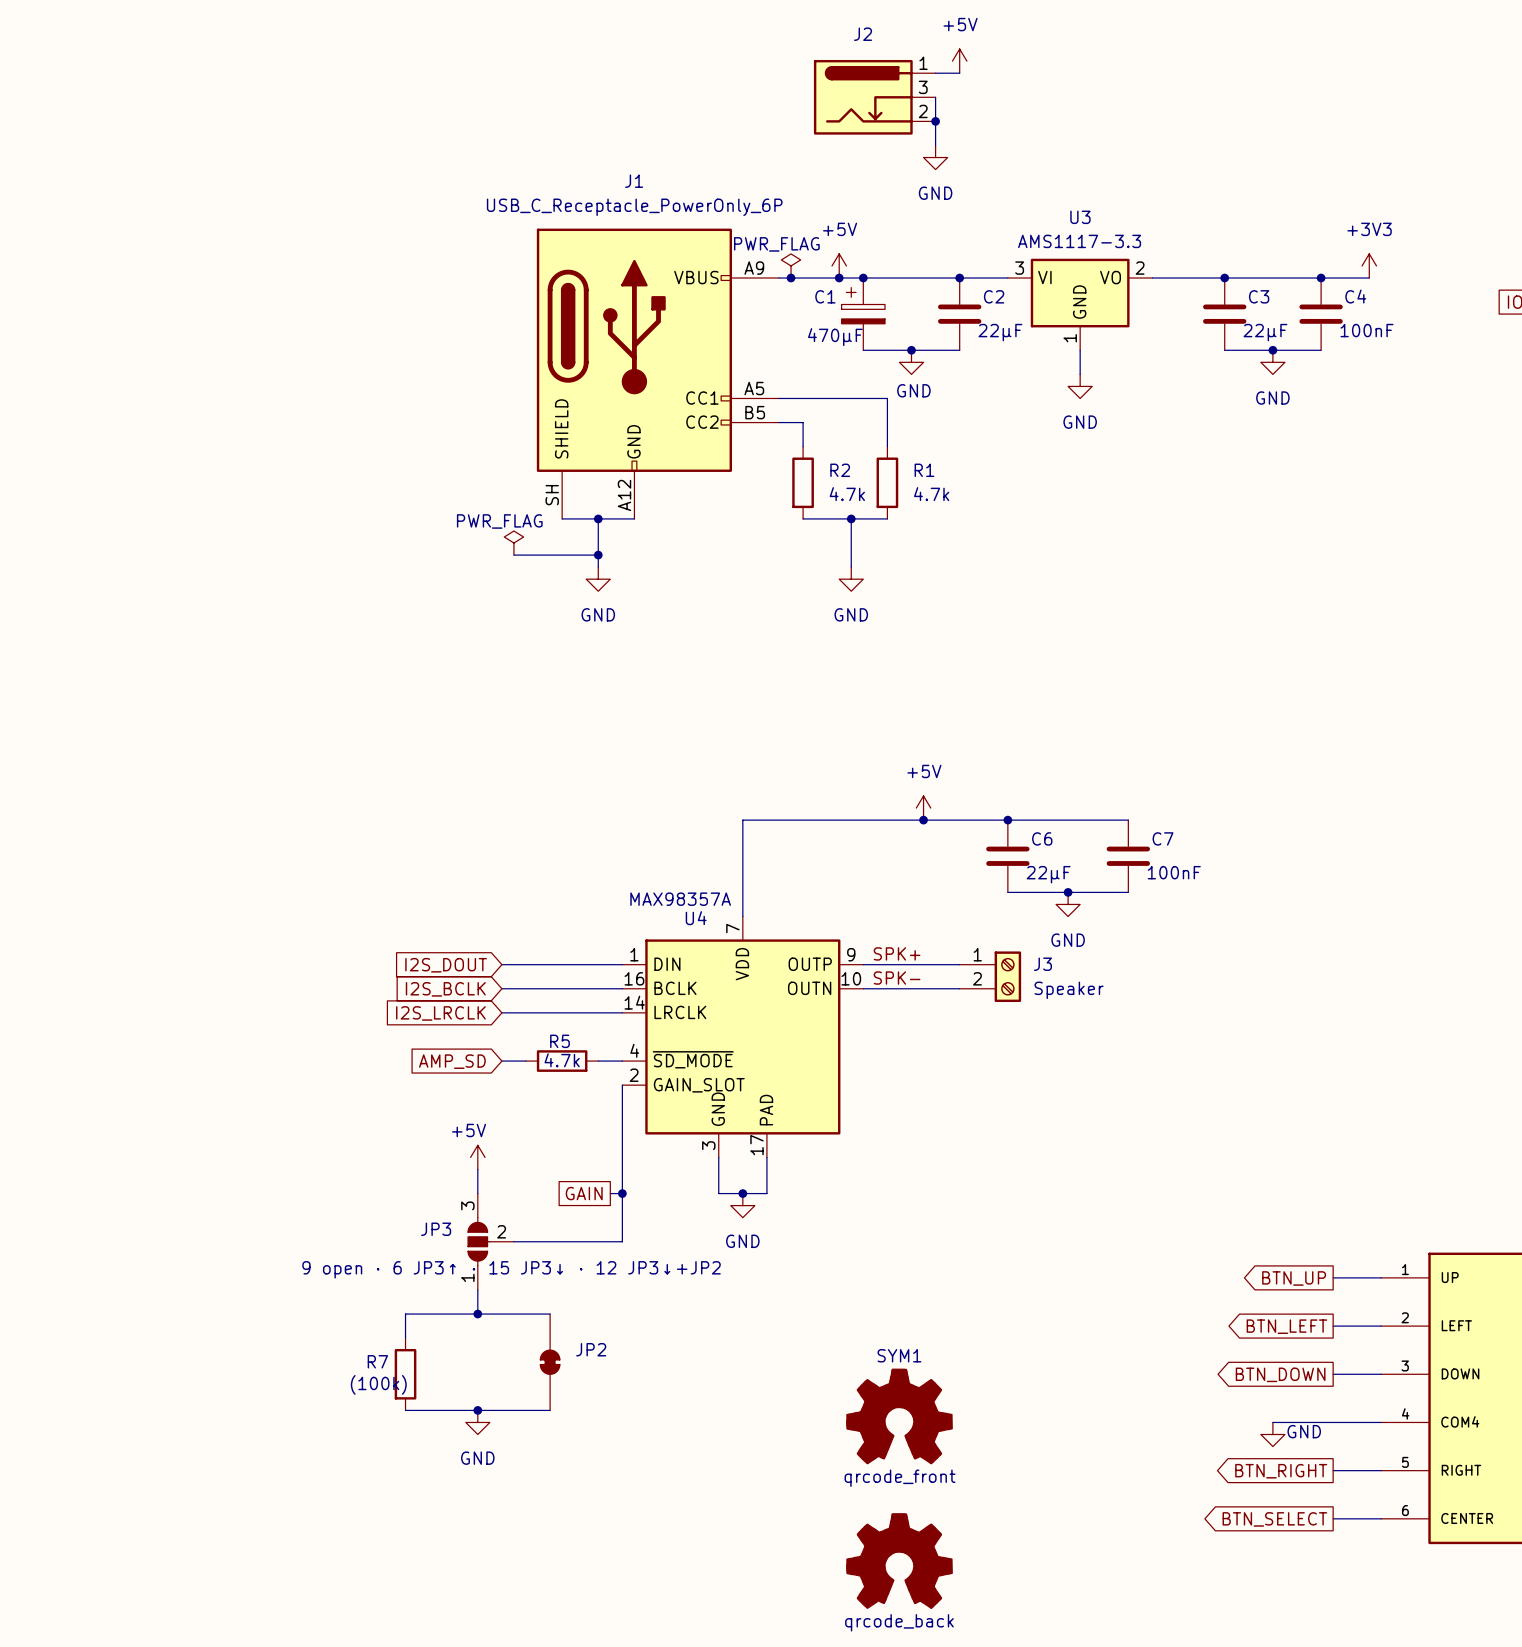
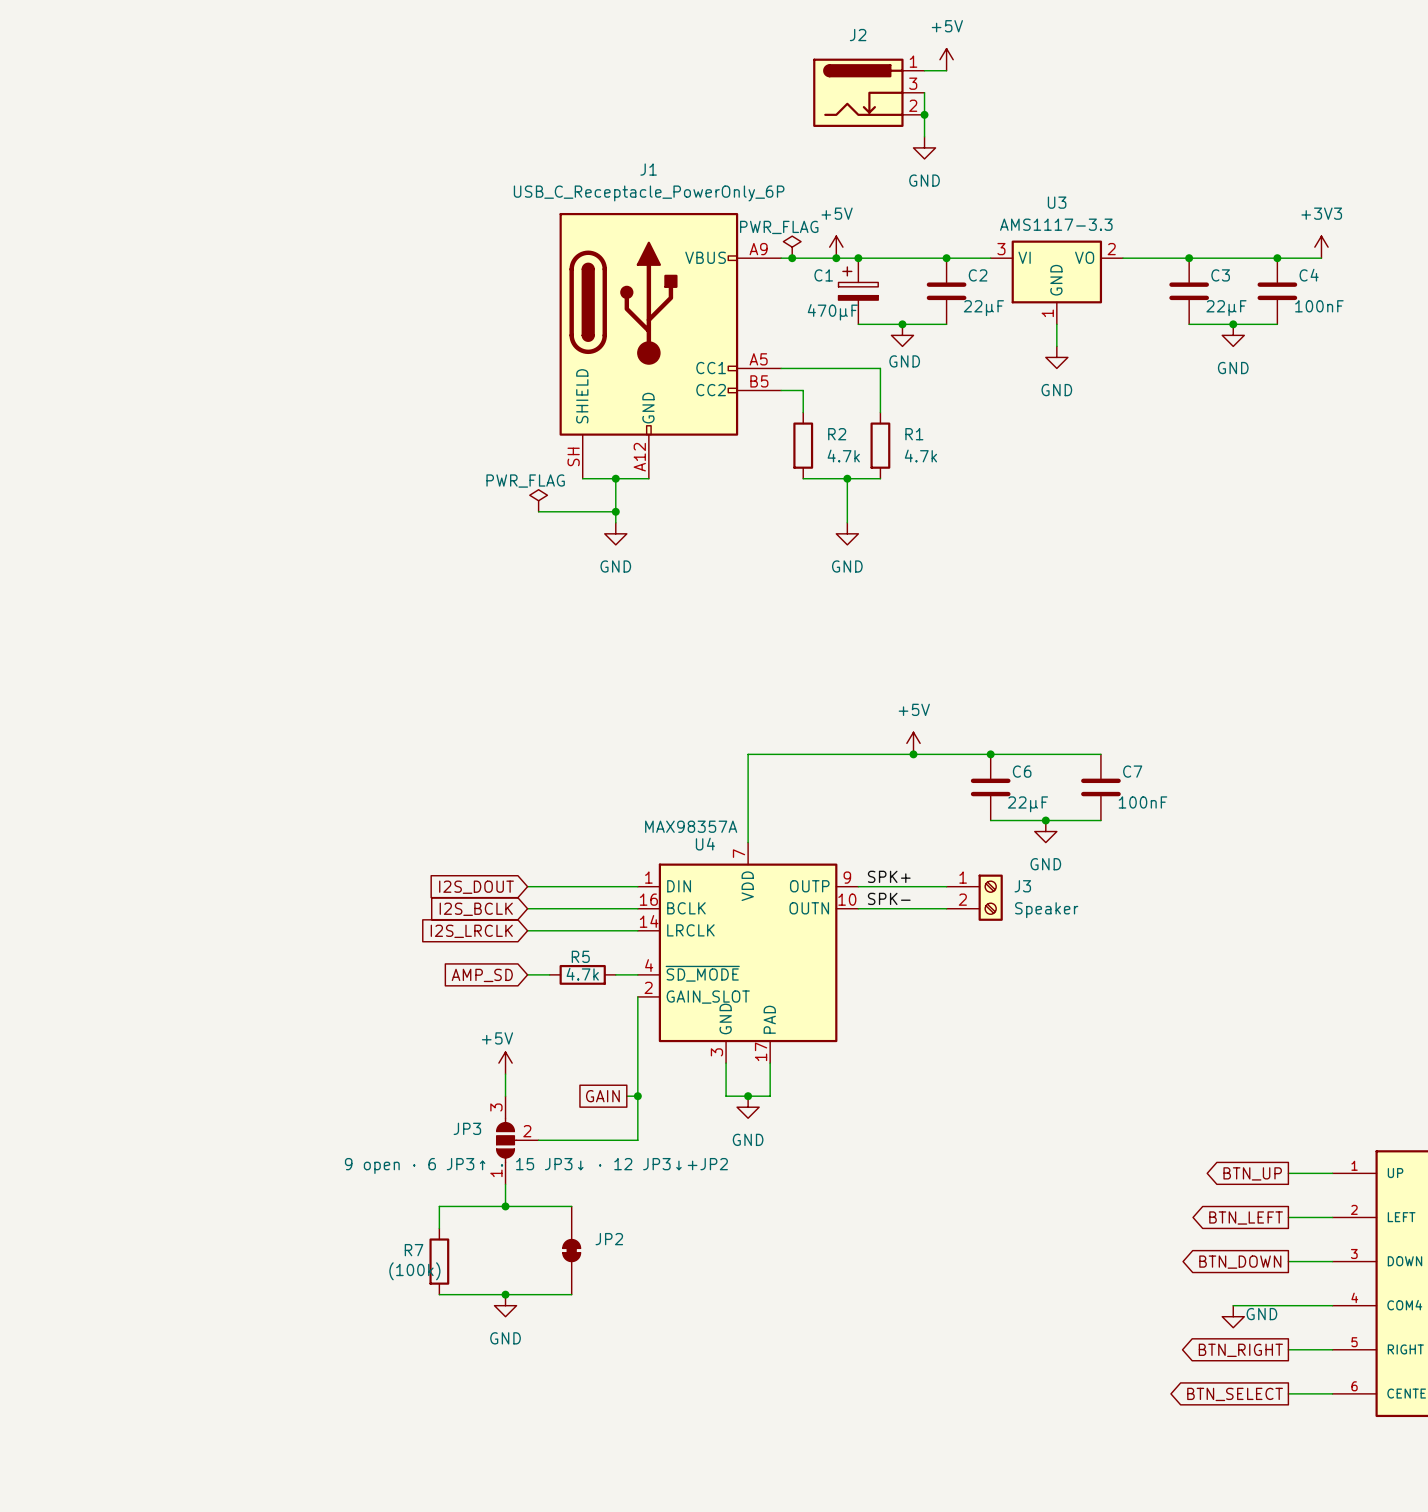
SYM1: qrcode_front (899, 1416) -> none
part: qrcode_back (899, 1561) -> none

